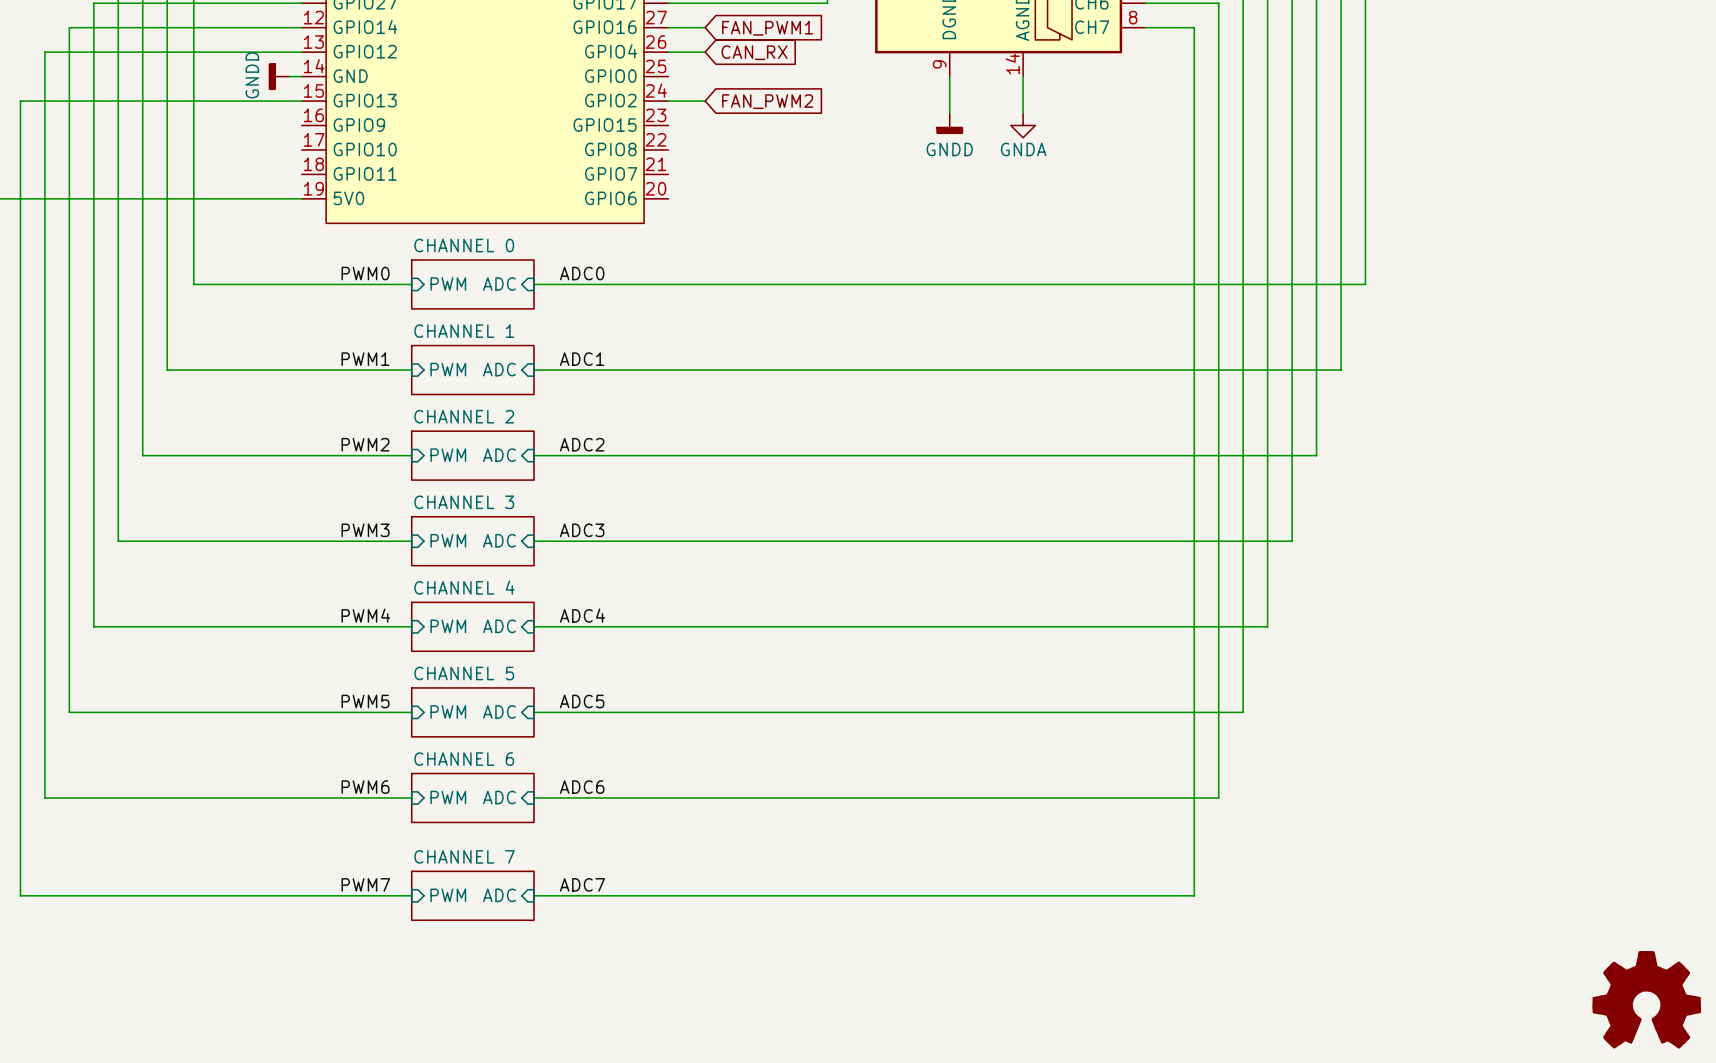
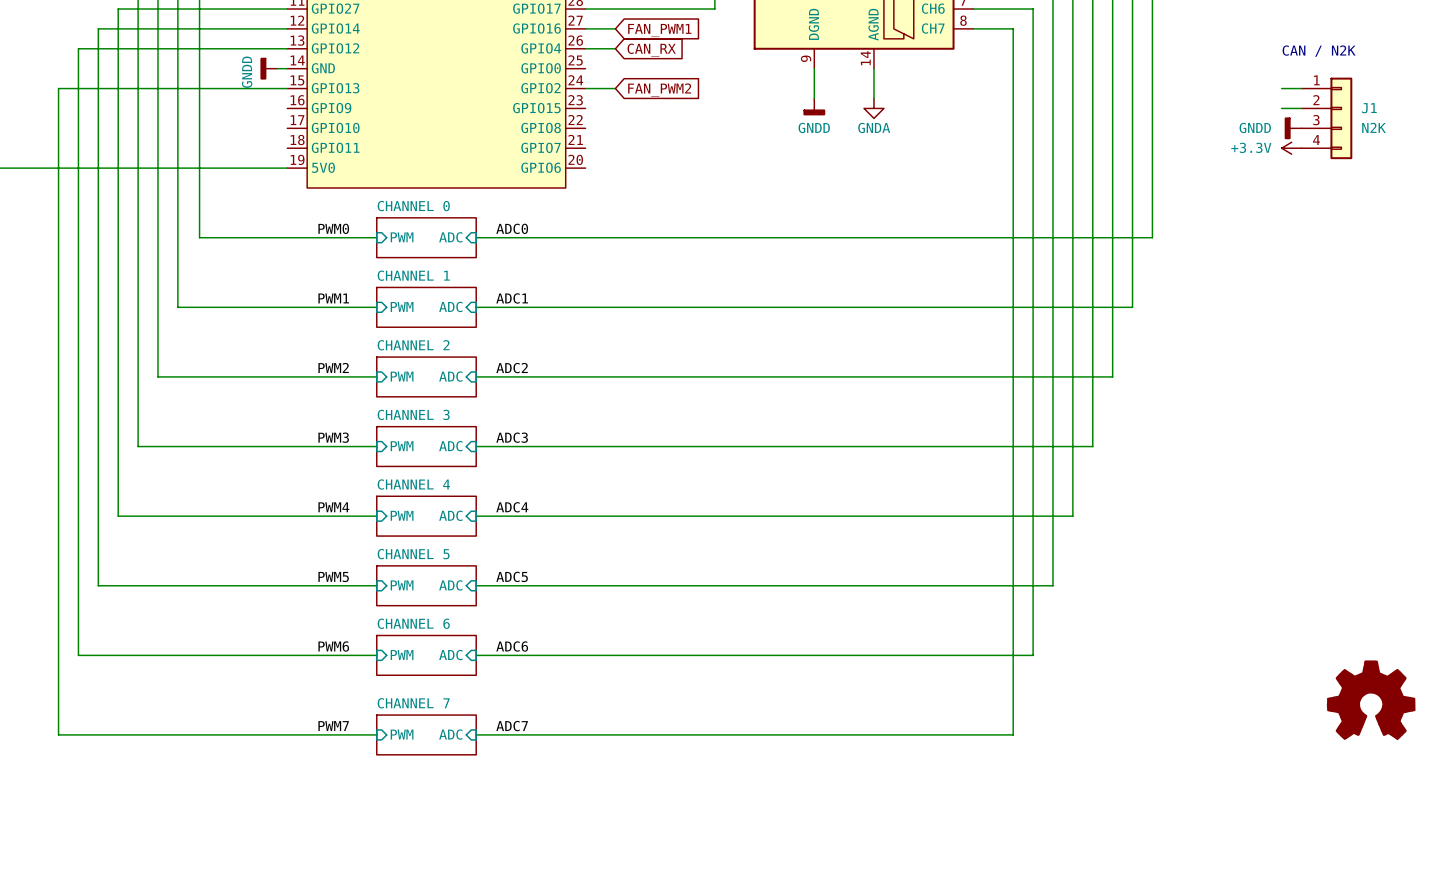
text: none -> CAN / N2K (1319, 51)
wire: none -> (1281, 88) (1301, 88)
wire: none -> (1281, 108) (1301, 108)
J1: none -> N2K (1326, 118)
power symbol: none -> GNDD (1293, 128)
power symbol: none -> +3.3V (1291, 148)
power symbol position: (1646, 999) -> (1371, 700)

